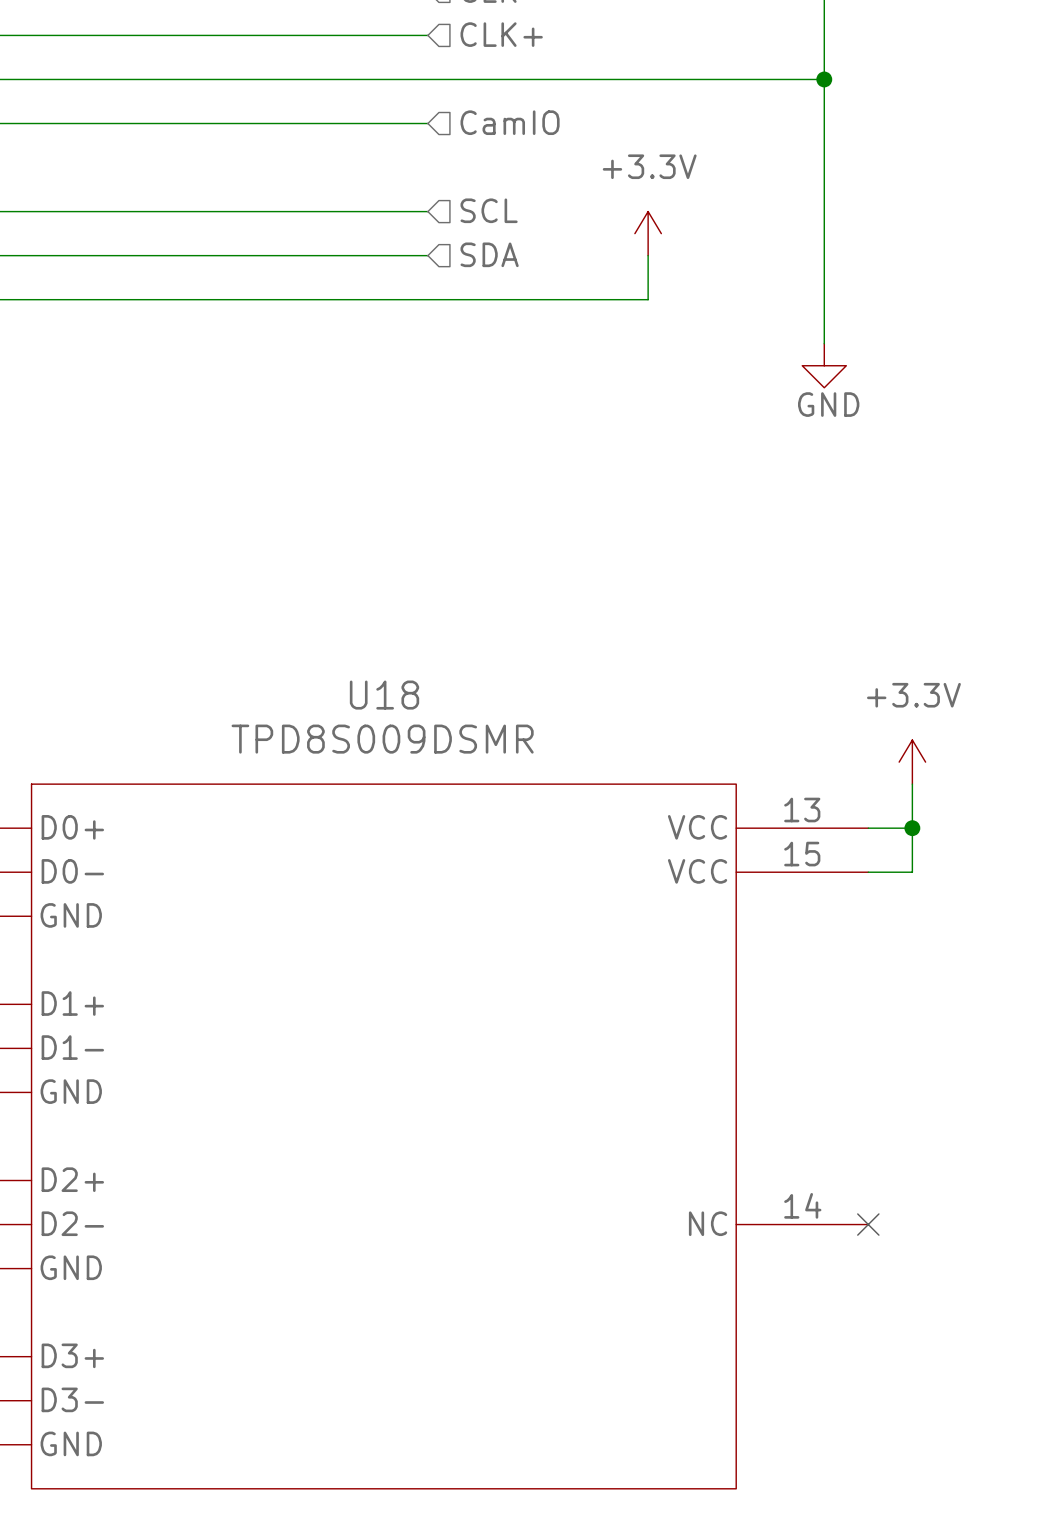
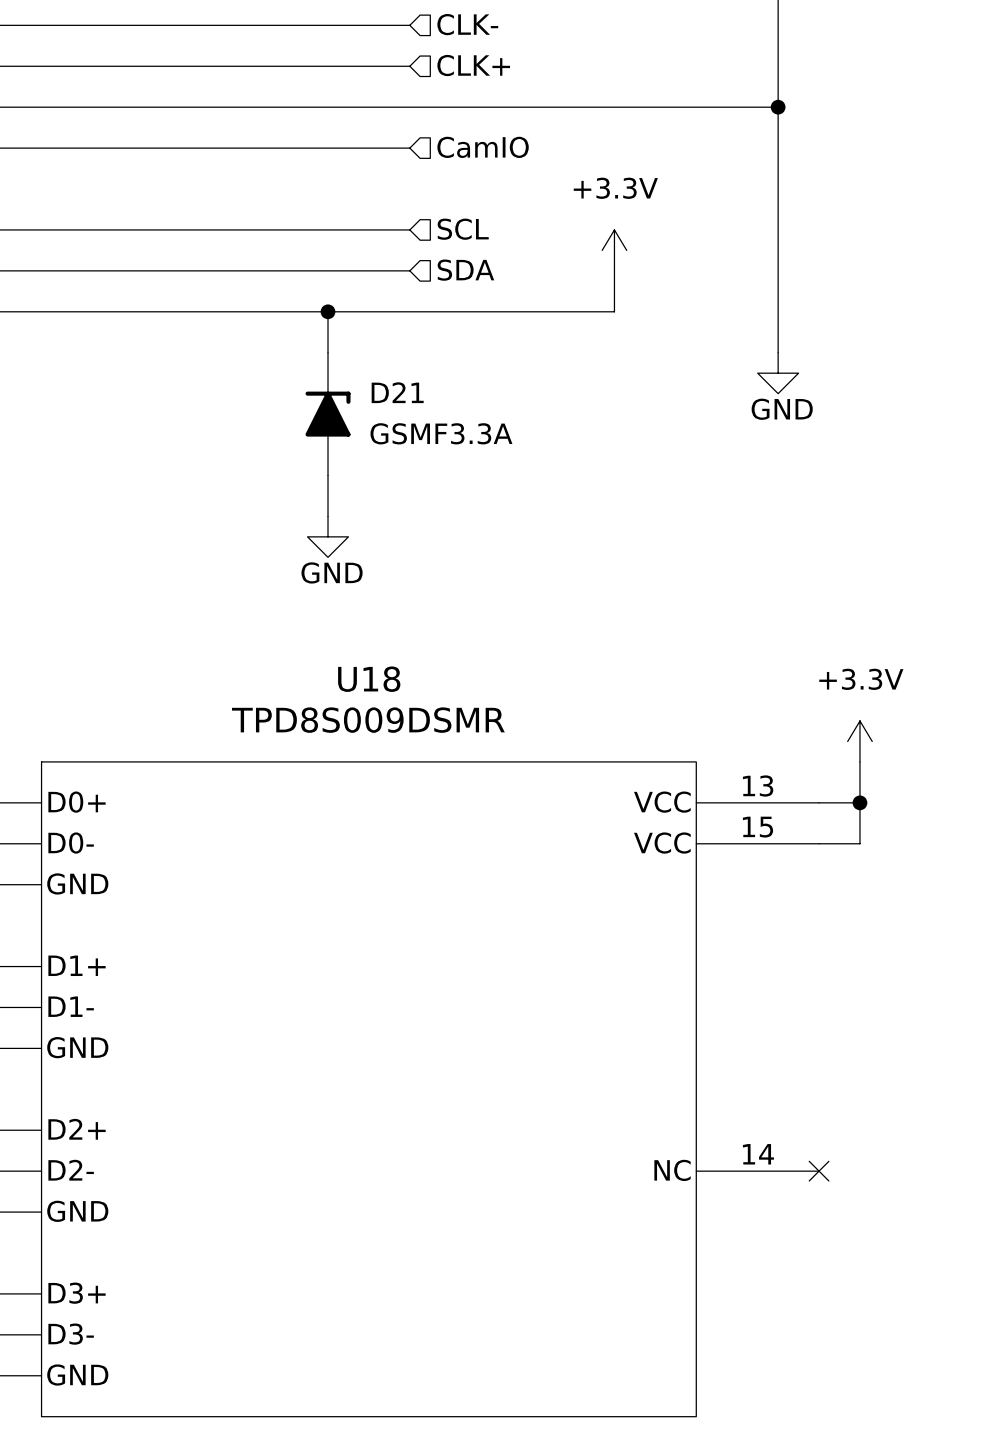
wire: none -> (328, 311) (328, 352)
junction: none -> (328, 311)
D21: none -> GSMF3.3A (328, 414)
wire: none -> (328, 475) (328, 516)
power symbol: none -> GND (328, 536)

